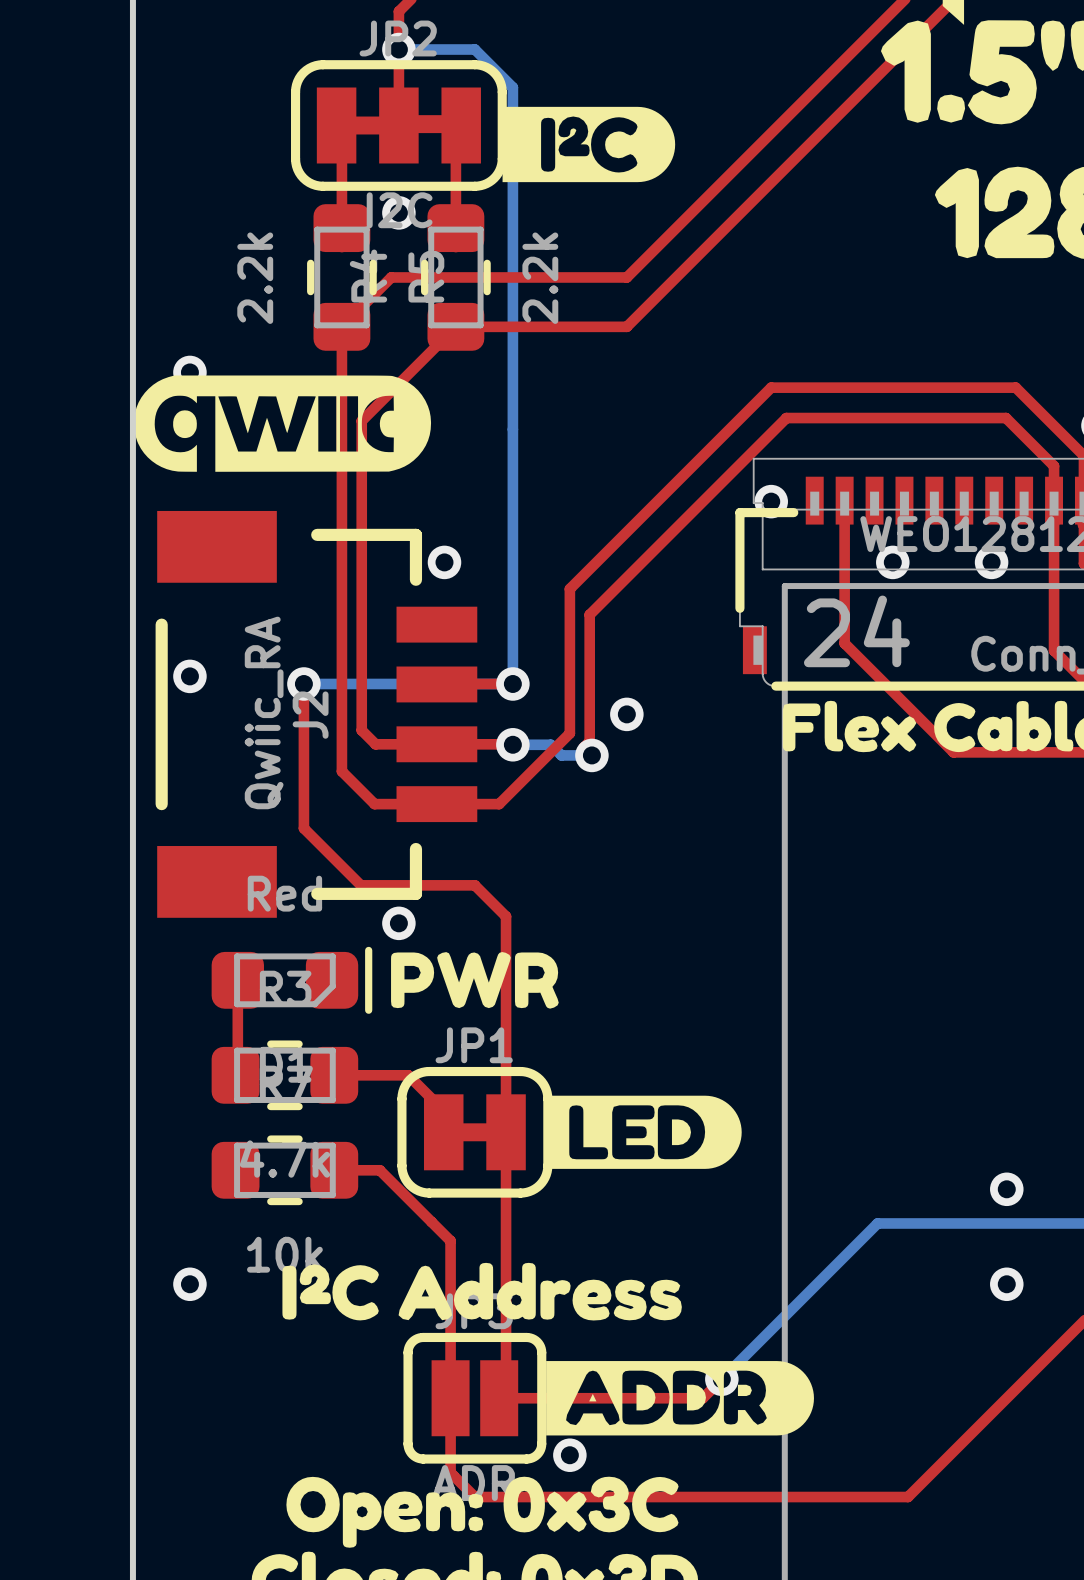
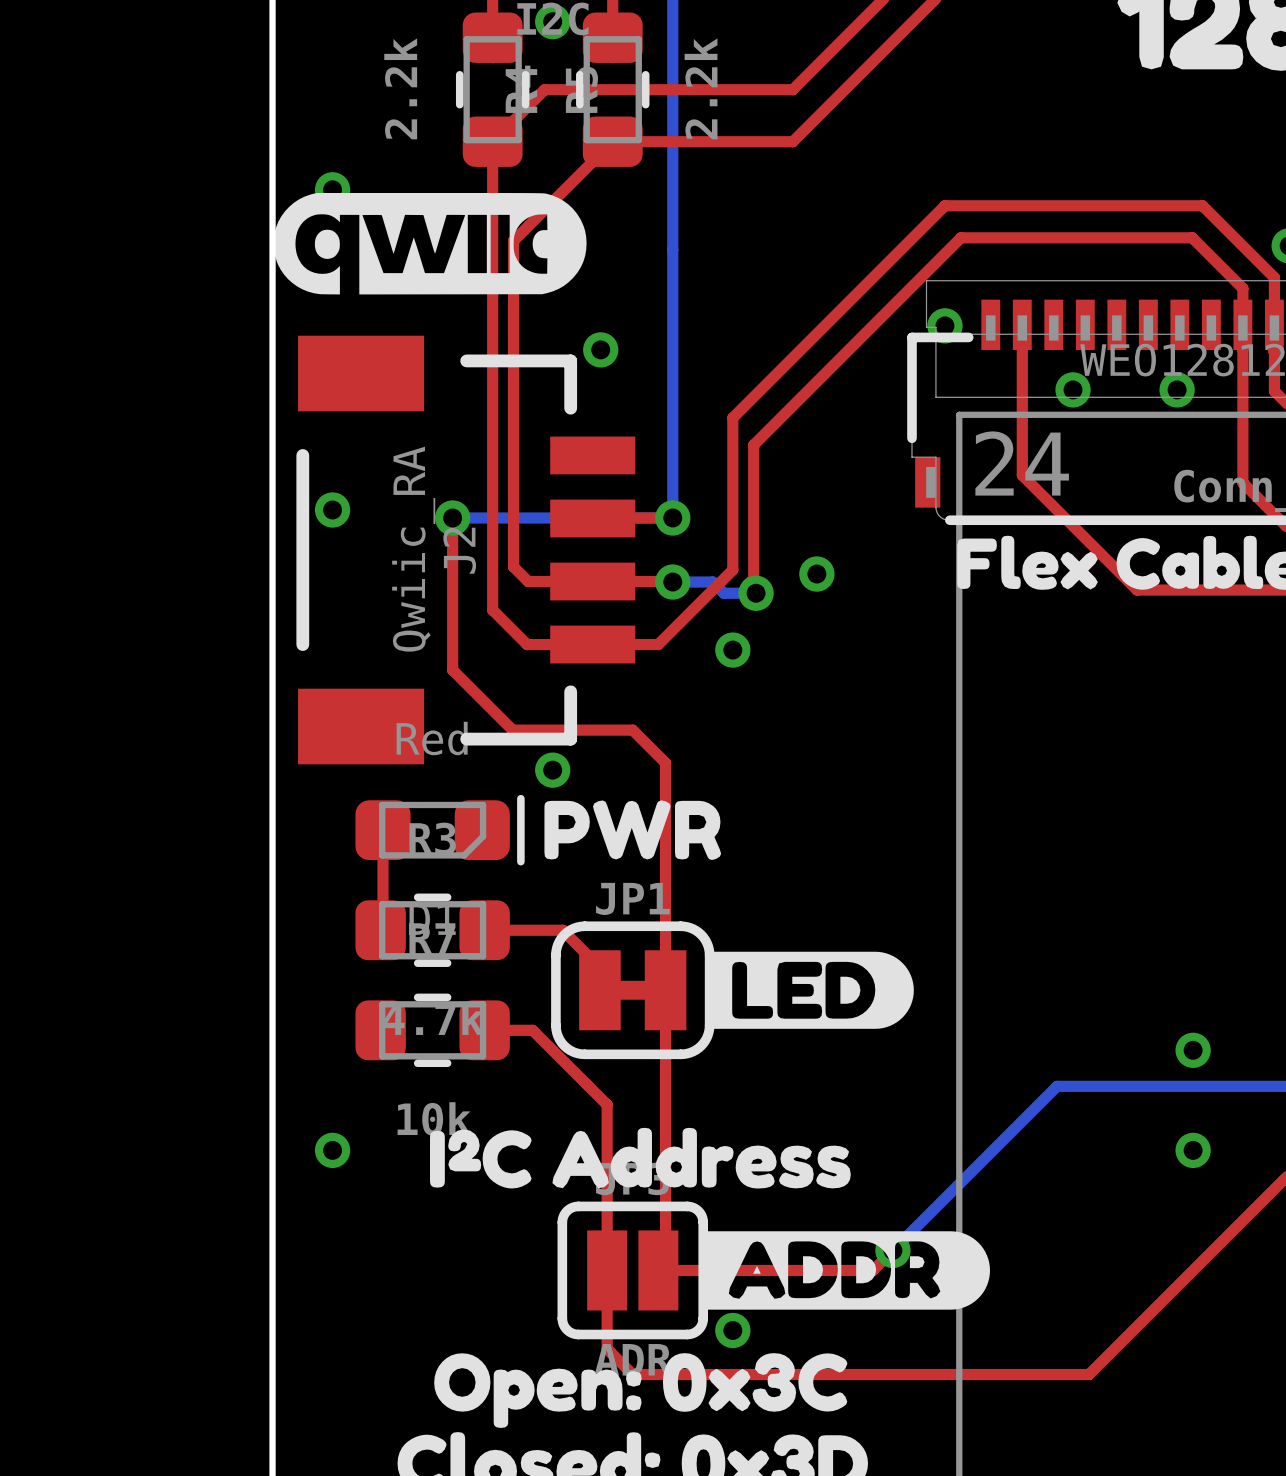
via position: (444, 562) -> (600, 349)
via position: (626, 714) -> (816, 574)
via: none -> (732, 650)

